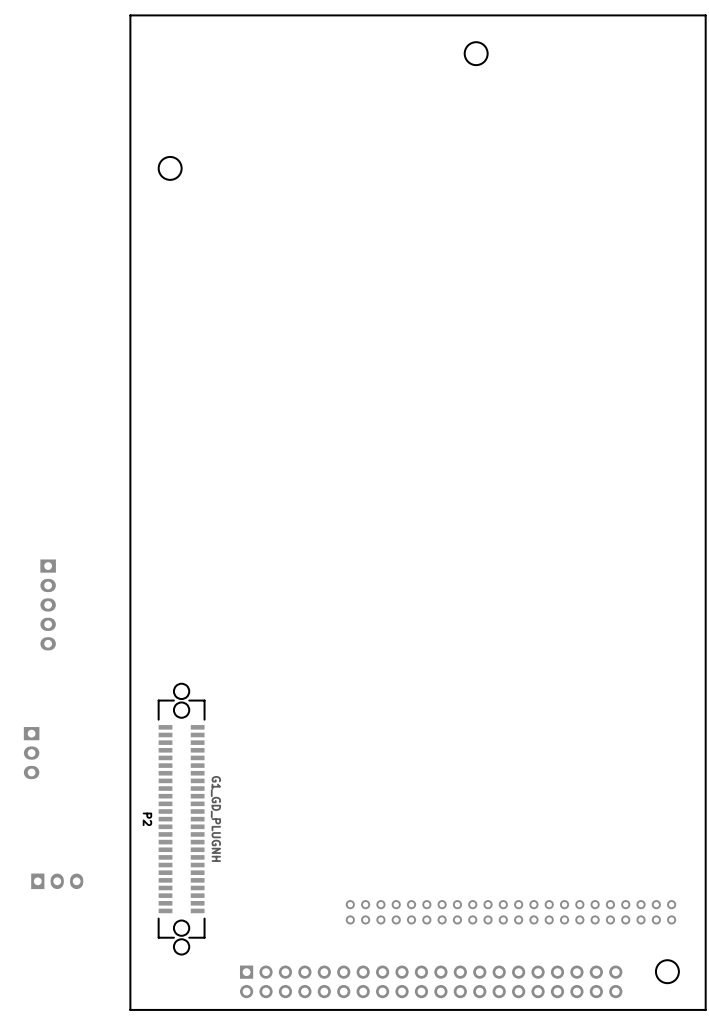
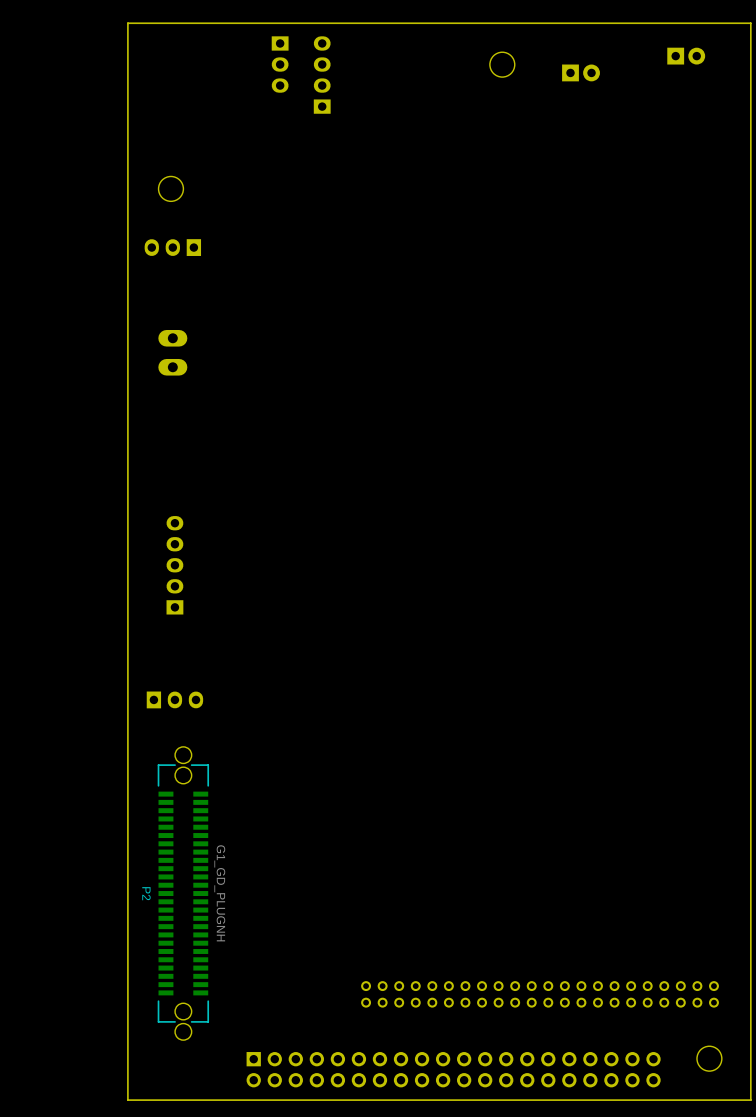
part: none -> (686, 56)
part: none -> (280, 64)
part: none -> (581, 72)
part: none -> (322, 75)
part: none -> (172, 247)
part: none -> (172, 352)
part rotation: 0° (48, 604) -> 180° (174, 565)
part position: (48, 604) -> (174, 565)
part: none -> (174, 699)
part: (31, 753) -> none
part: (57, 881) -> none

